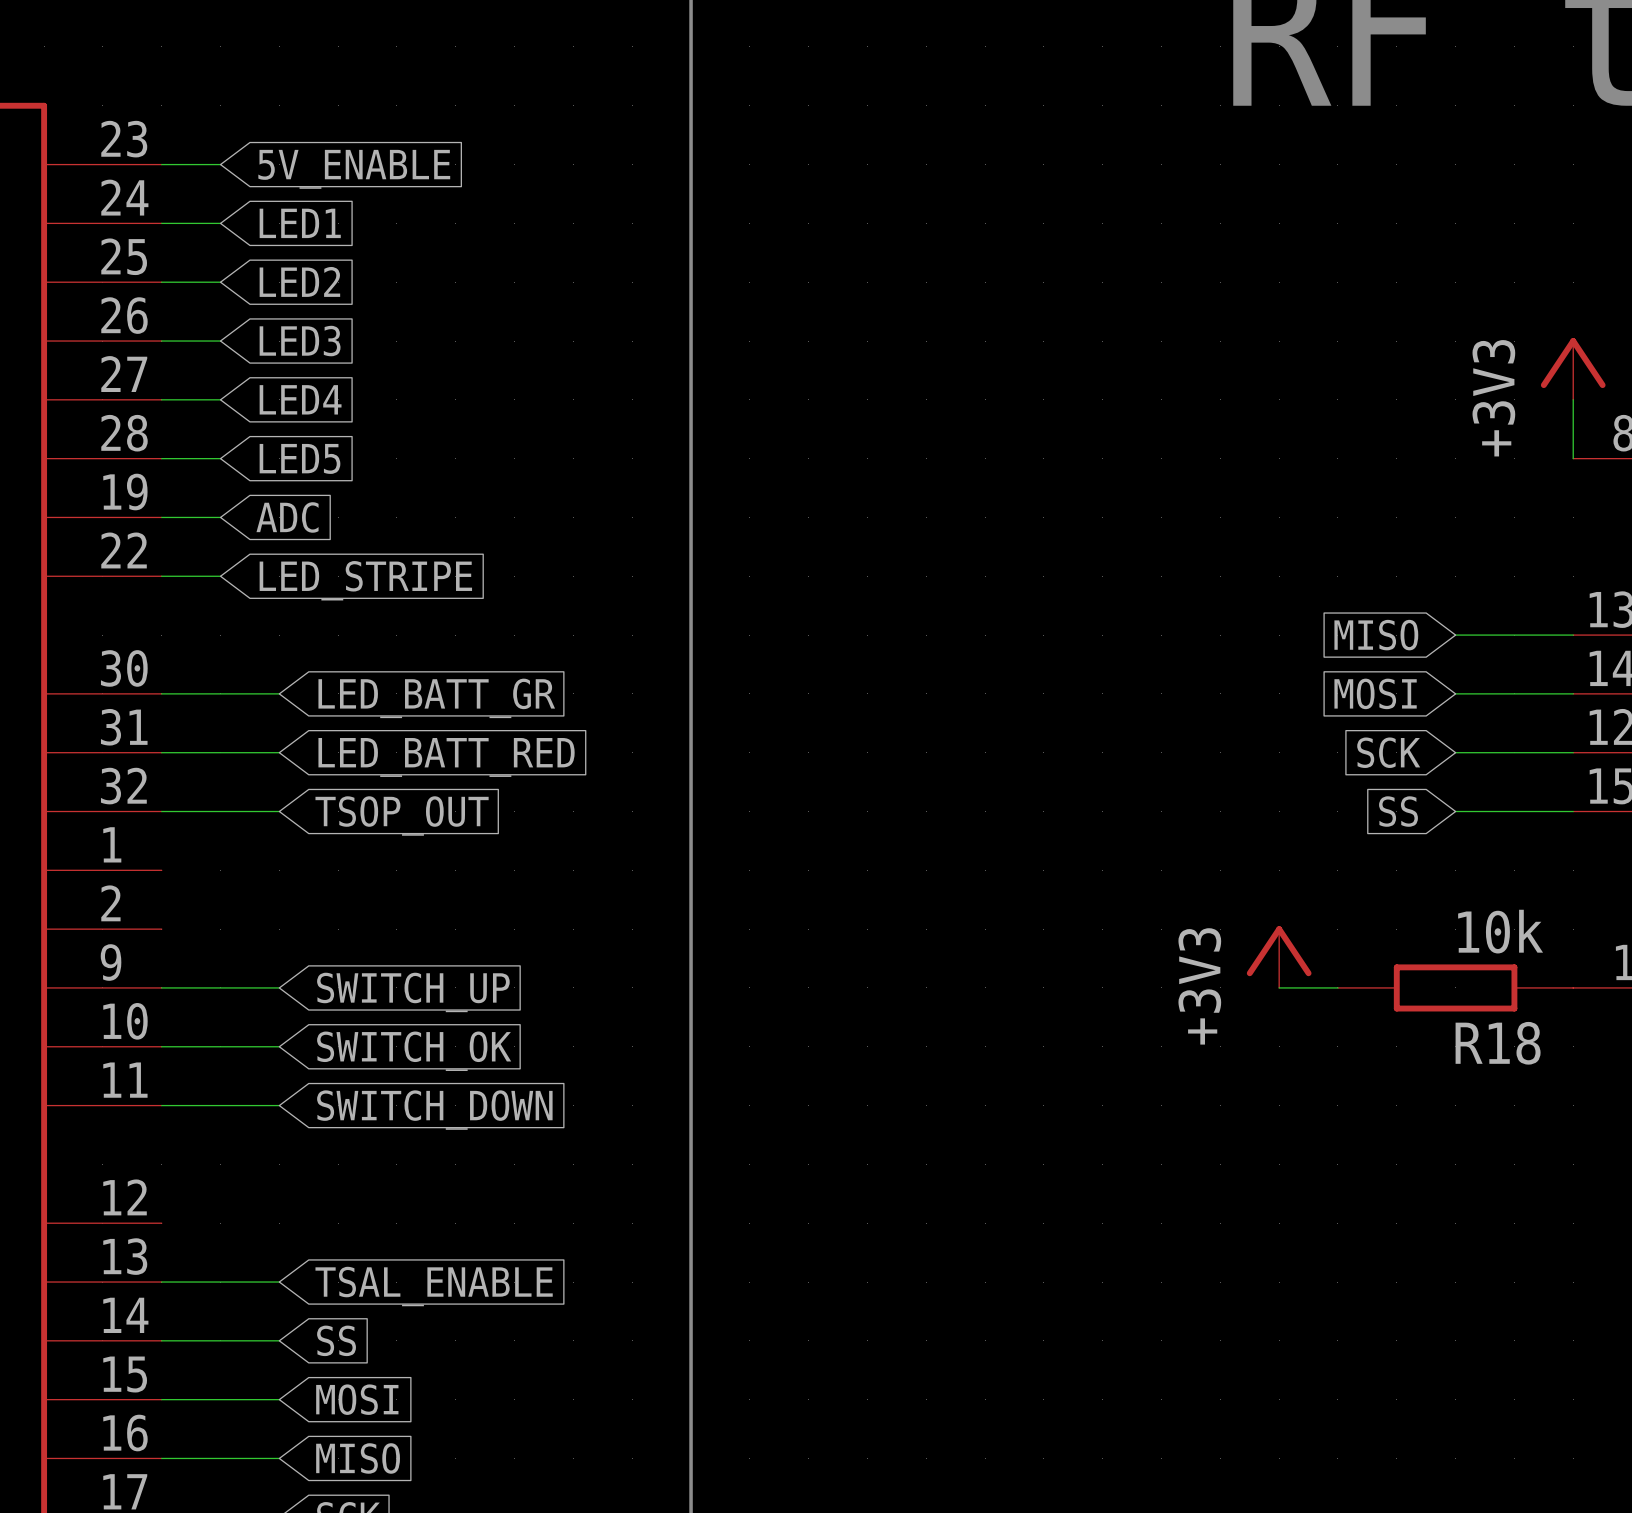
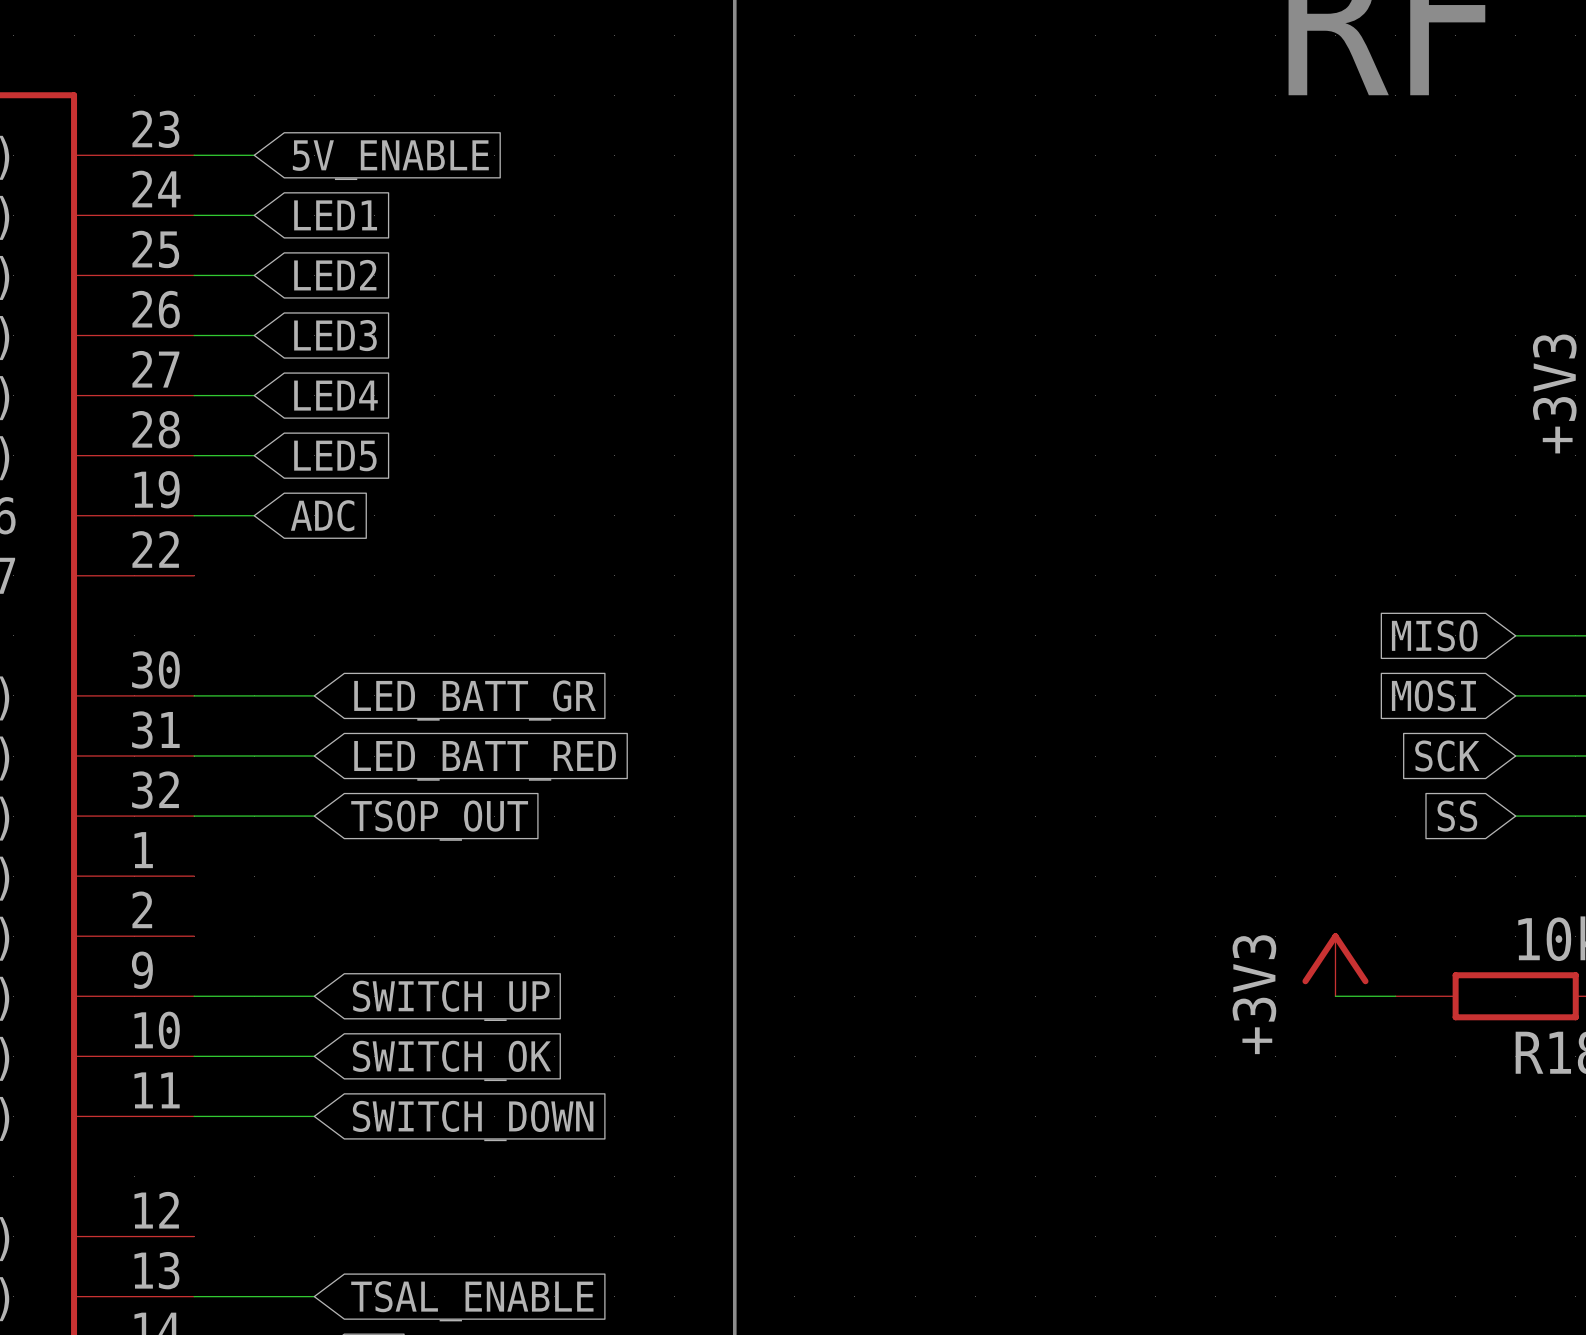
wire: (161, 576) (220, 576) -> none
global label: LED_STRIPE (365, 580) -> none

